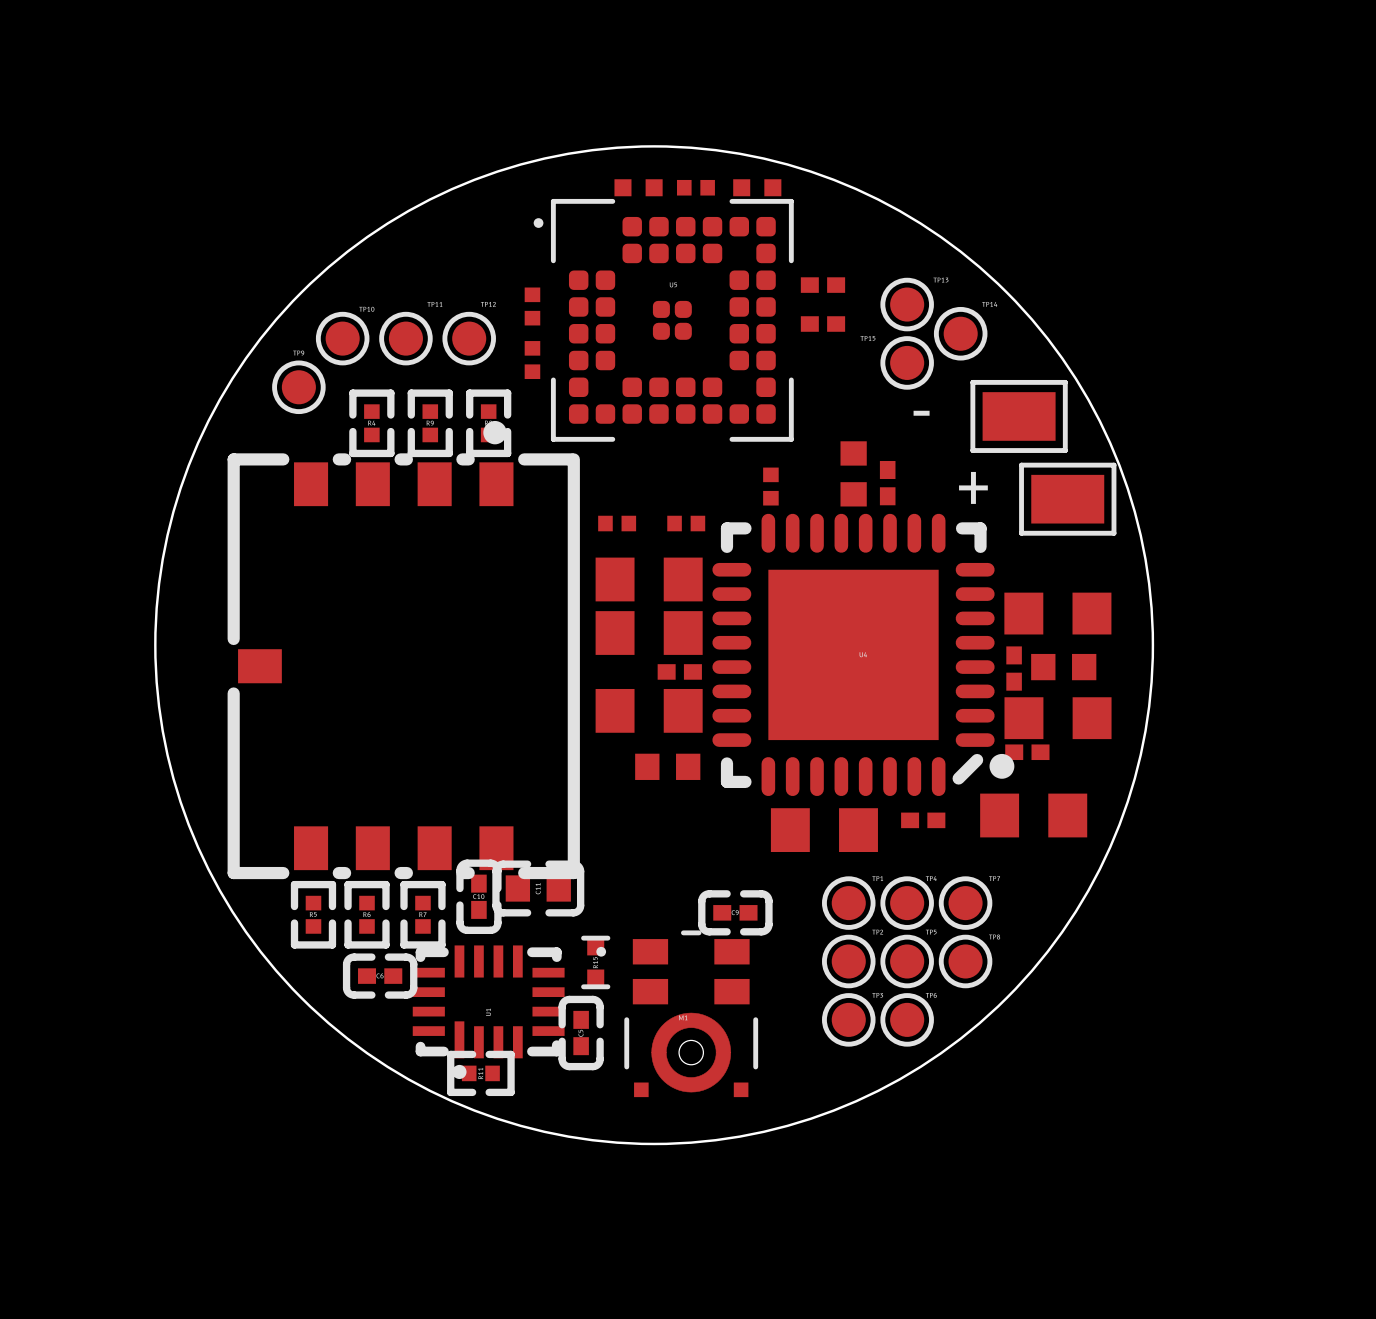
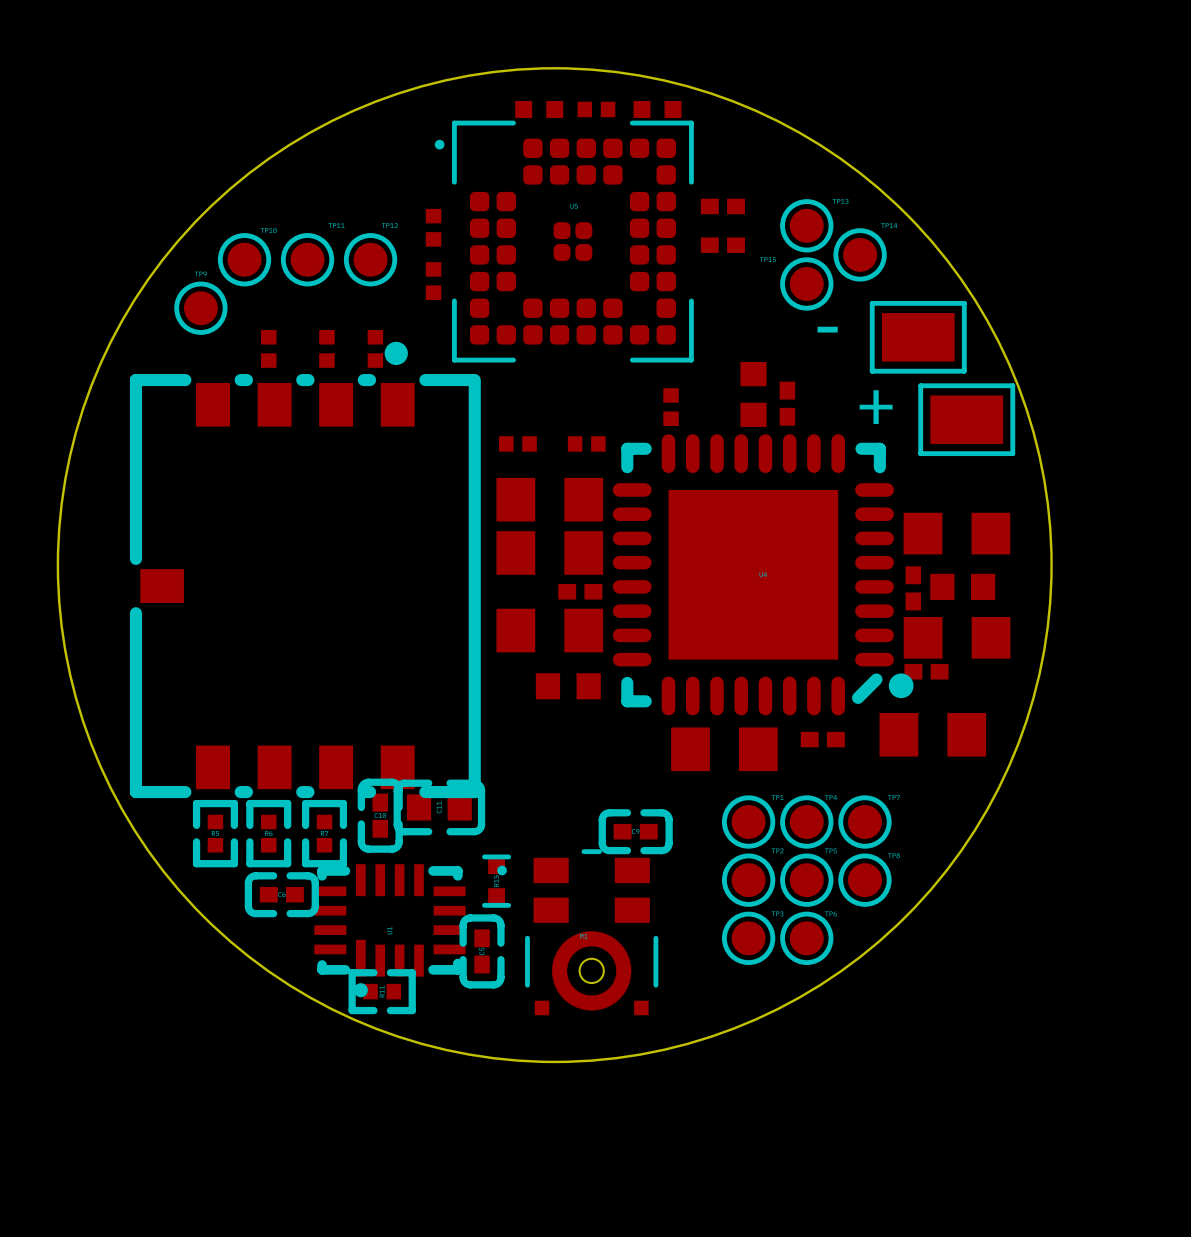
part: (371, 423) -> none
part: (430, 423) -> none
part: (488, 423) -> none
part: none -> (268, 348)
part: none -> (326, 348)
part: none -> (375, 348)

